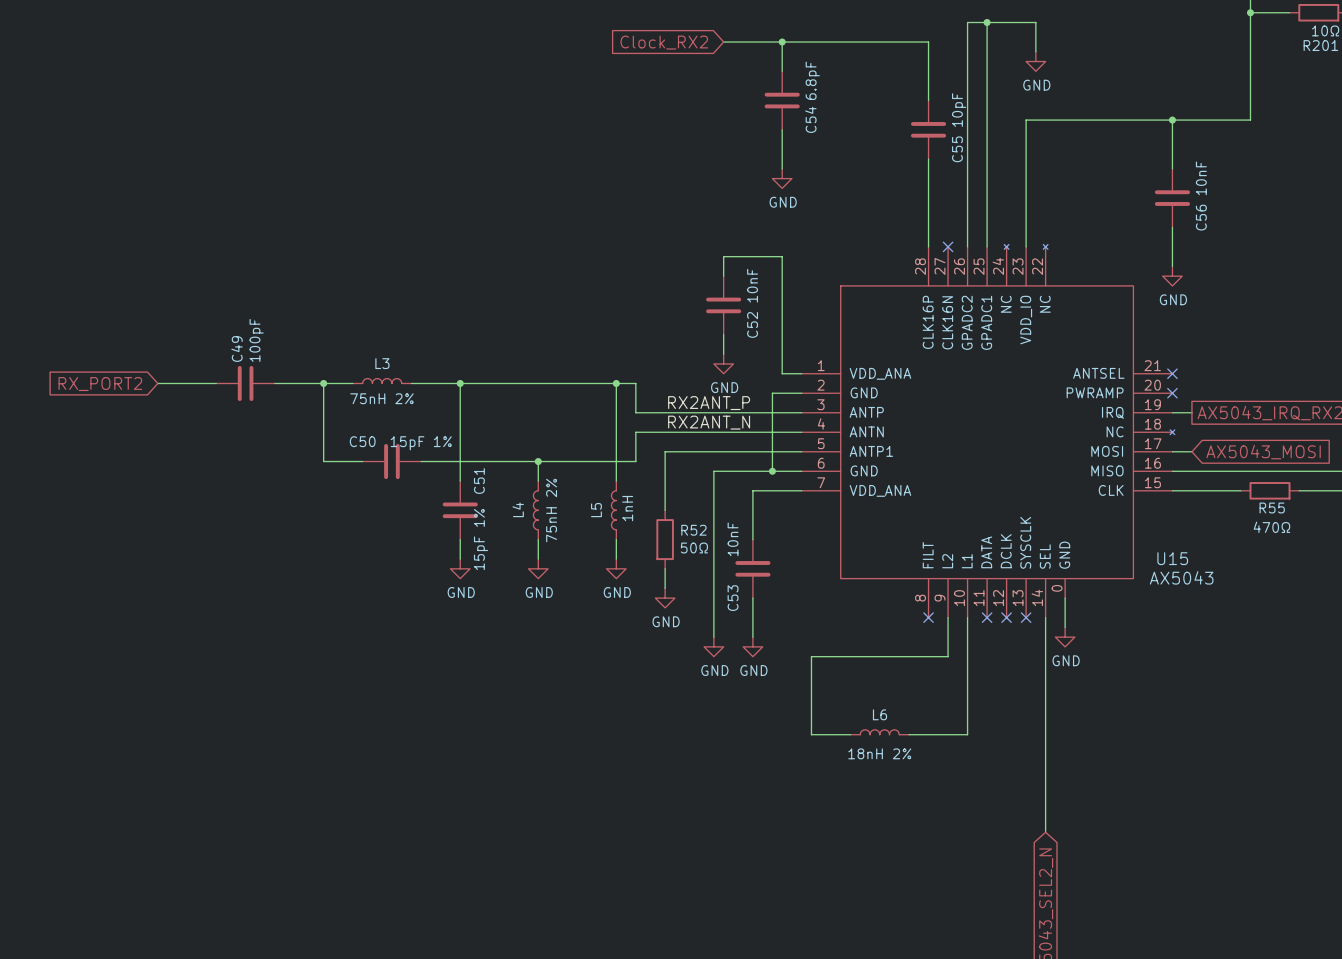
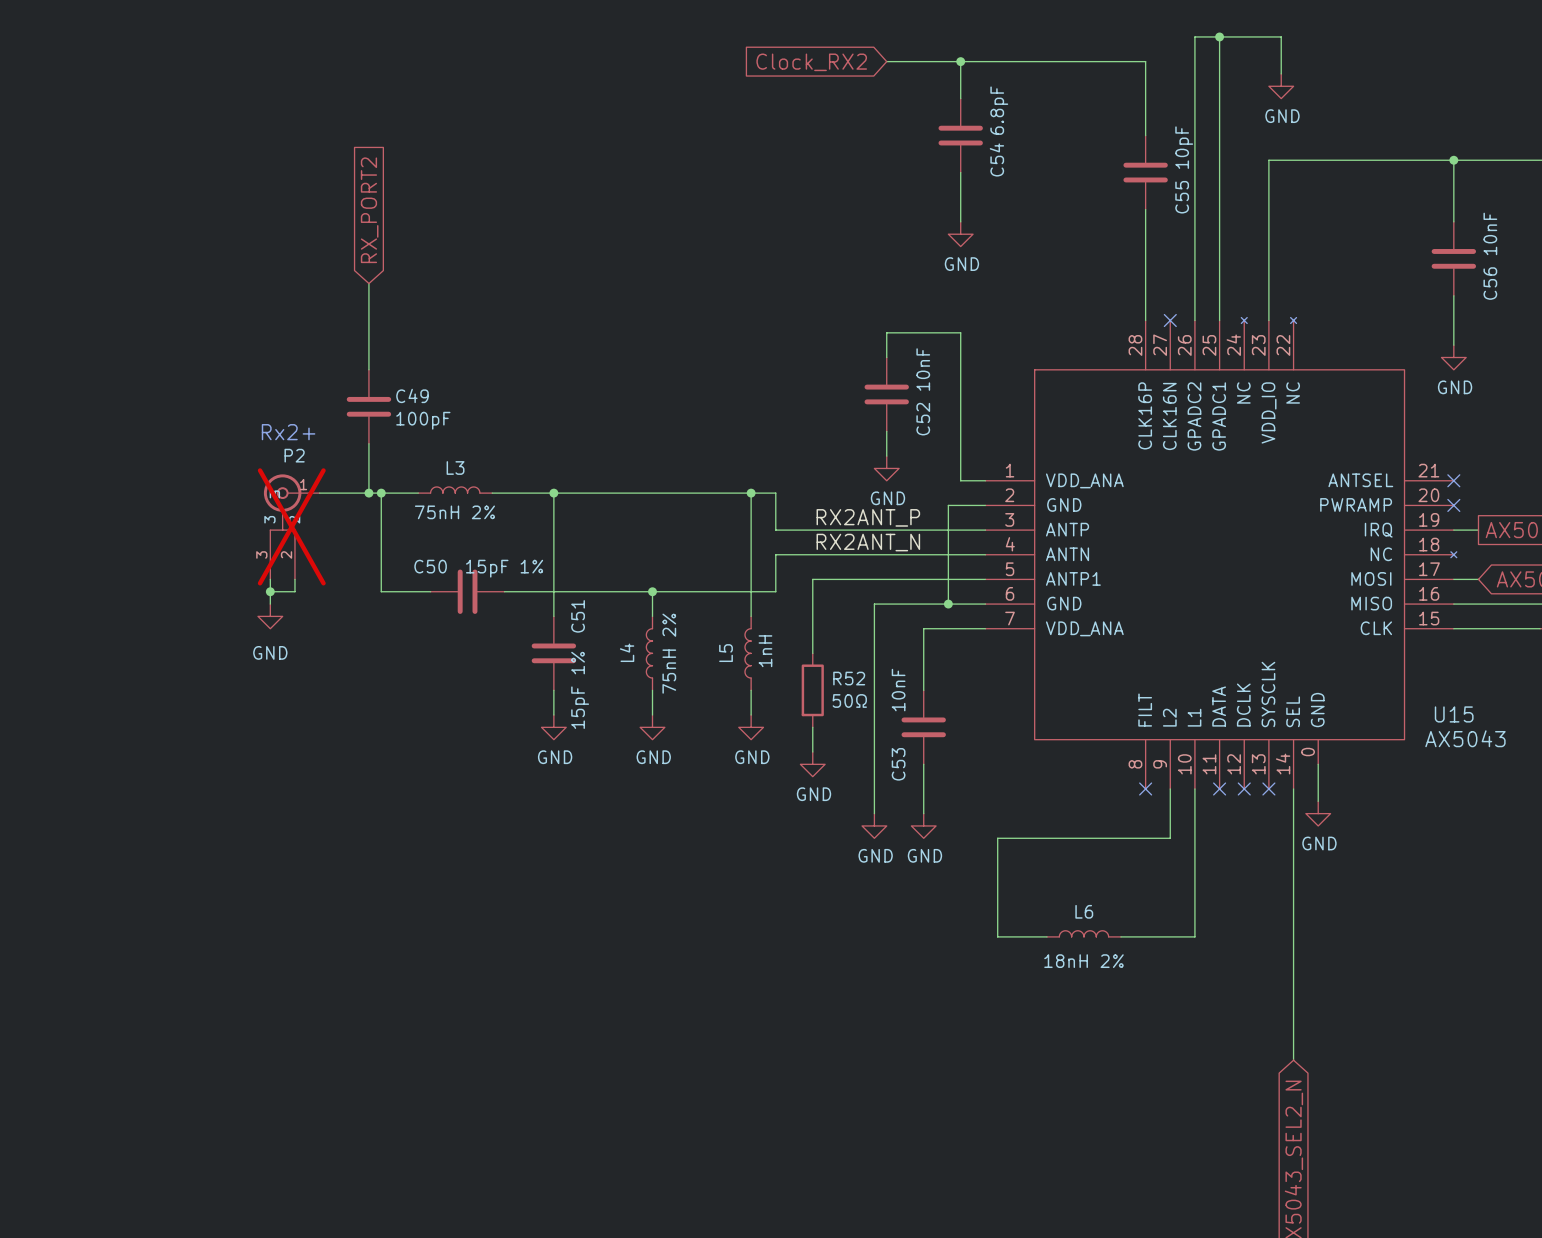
global label: none -> RX_PORT2 (369, 210)
wire: none -> (368, 283) (368, 369)
text: none -> Rx2+ (288, 432)
wire: none -> (368, 443) (368, 493)
wire: (157, 383) (216, 383) -> none
C49 rotation: 0° (245, 383) -> 90° clockwise (368, 406)
C49 position: (245, 383) -> (368, 406)
junction: none -> (368, 493)
global label: RX_PORT2 (100, 384) -> none
P2: none -> (291, 526)
wire: none -> (270, 579) (270, 604)
wire: none -> (294, 579) (294, 591) (270, 591)
junction: none -> (270, 591)
power symbol: none -> GND (270, 616)

